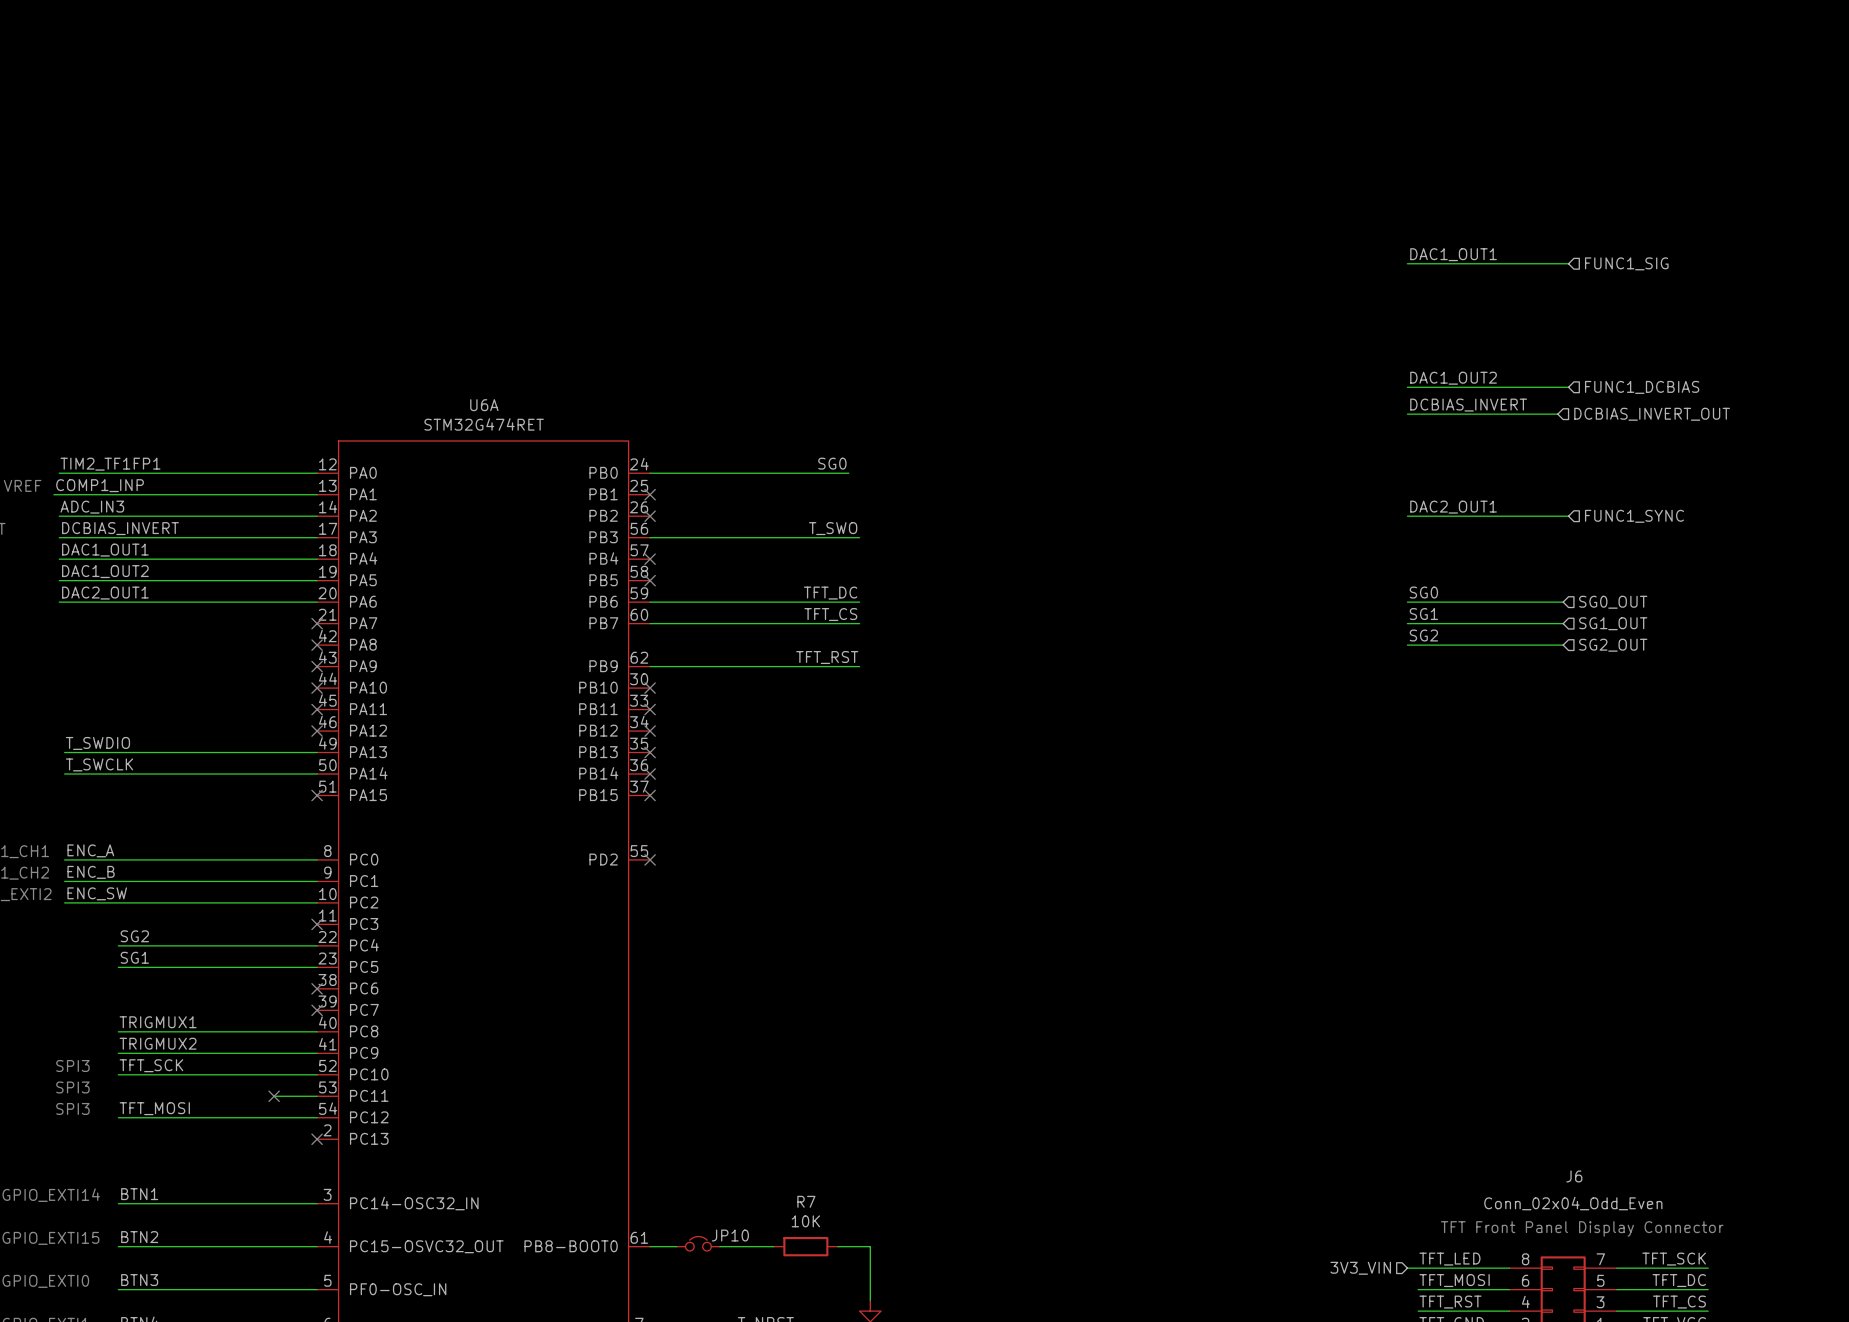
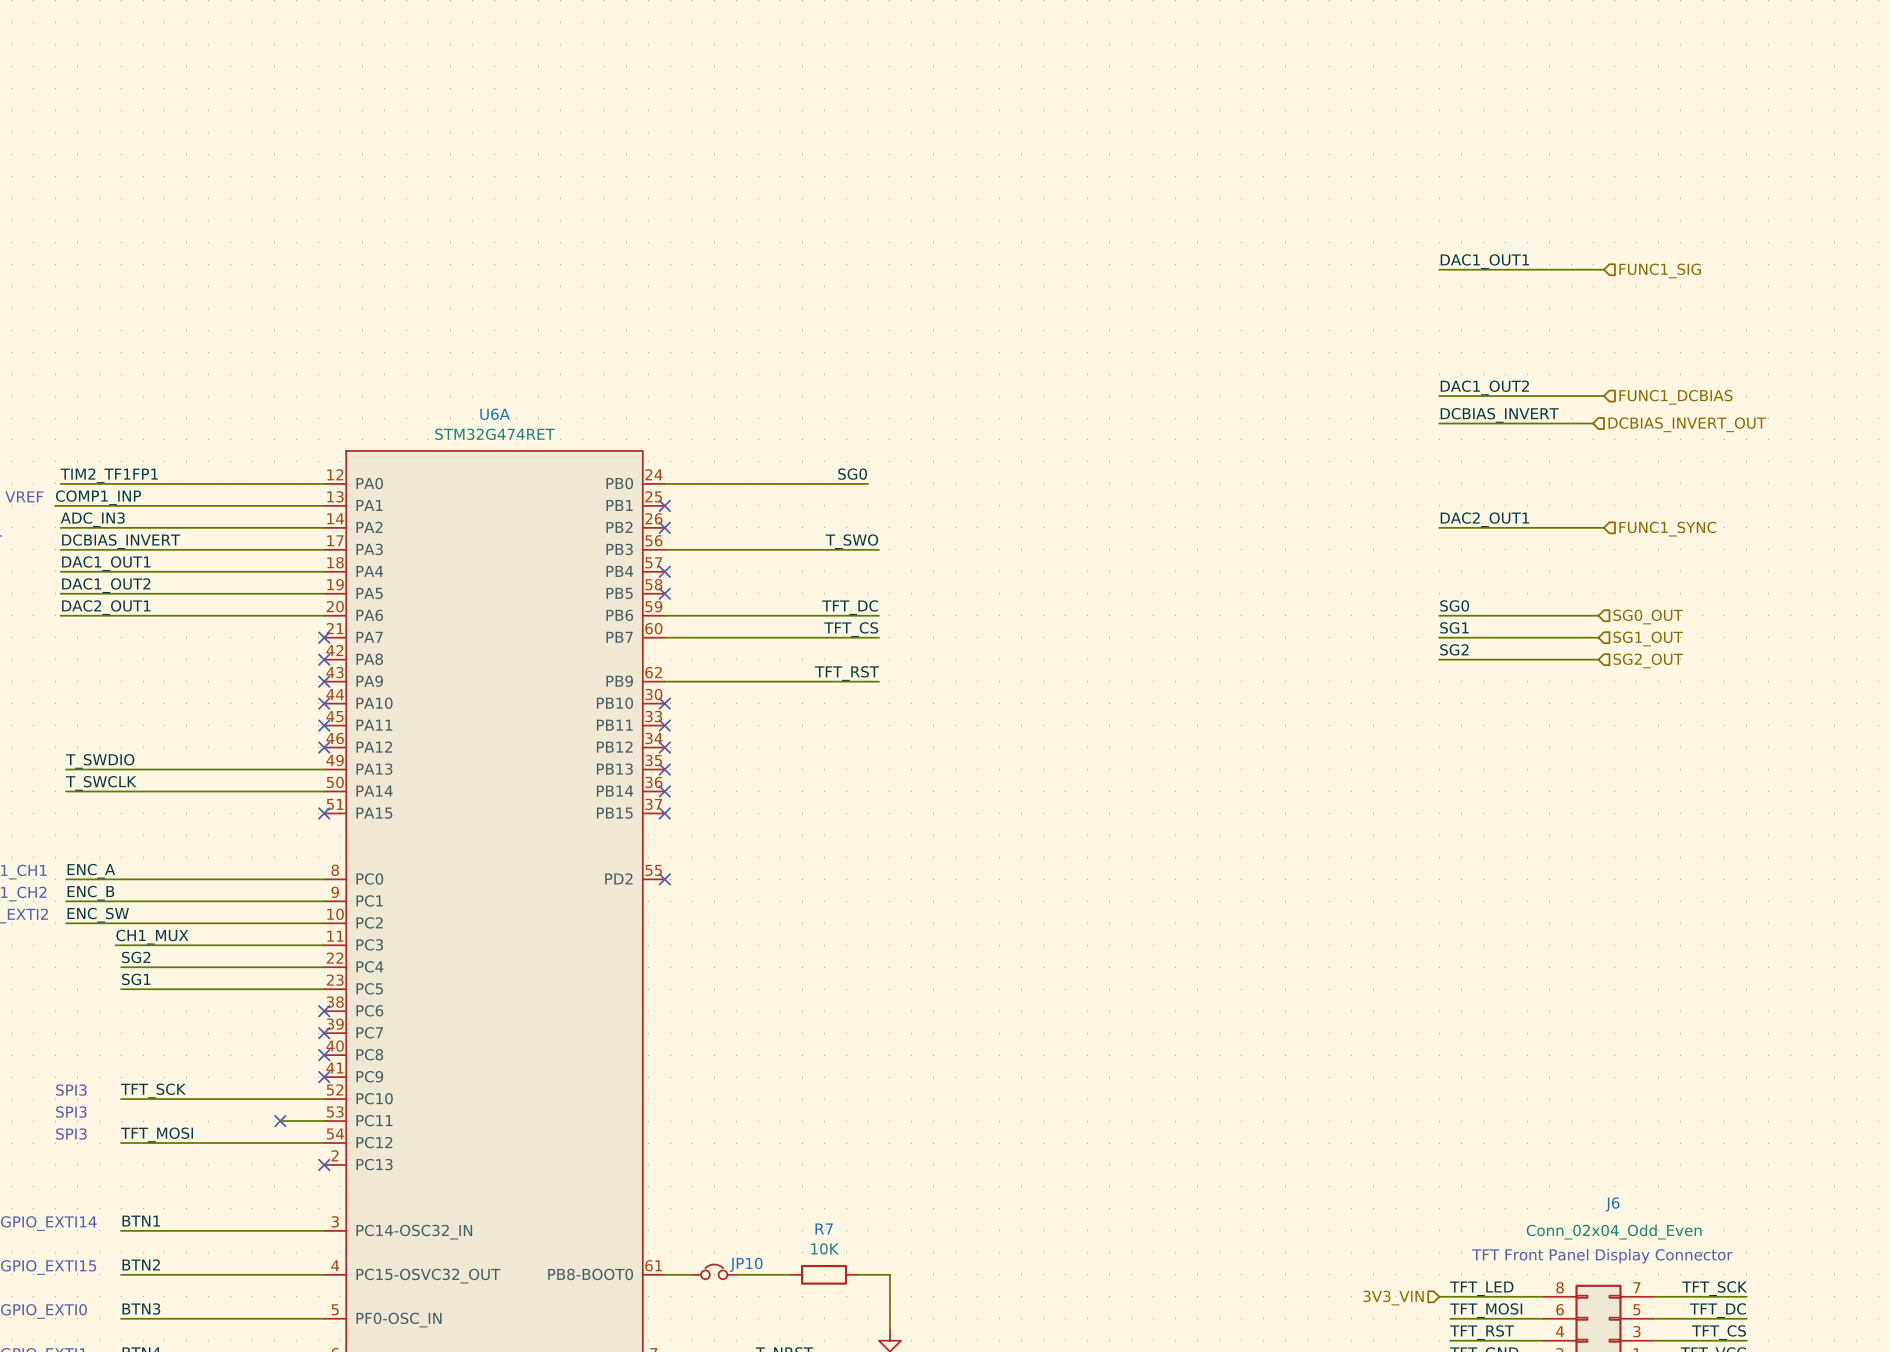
label: none -> CH1_MUX (152, 937)
wire: none -> (115, 945) (324, 945)
no-connect mark: (317, 924) -> none
label: TRIGMUX1 (158, 1022) -> none
wire: (118, 1031) (317, 1031) -> none
no-connect mark: none -> (324, 1055)
label: TRIGMUX2 (158, 1043) -> none
wire: (118, 1053) (317, 1053) -> none
no-connect mark: none -> (324, 1077)

